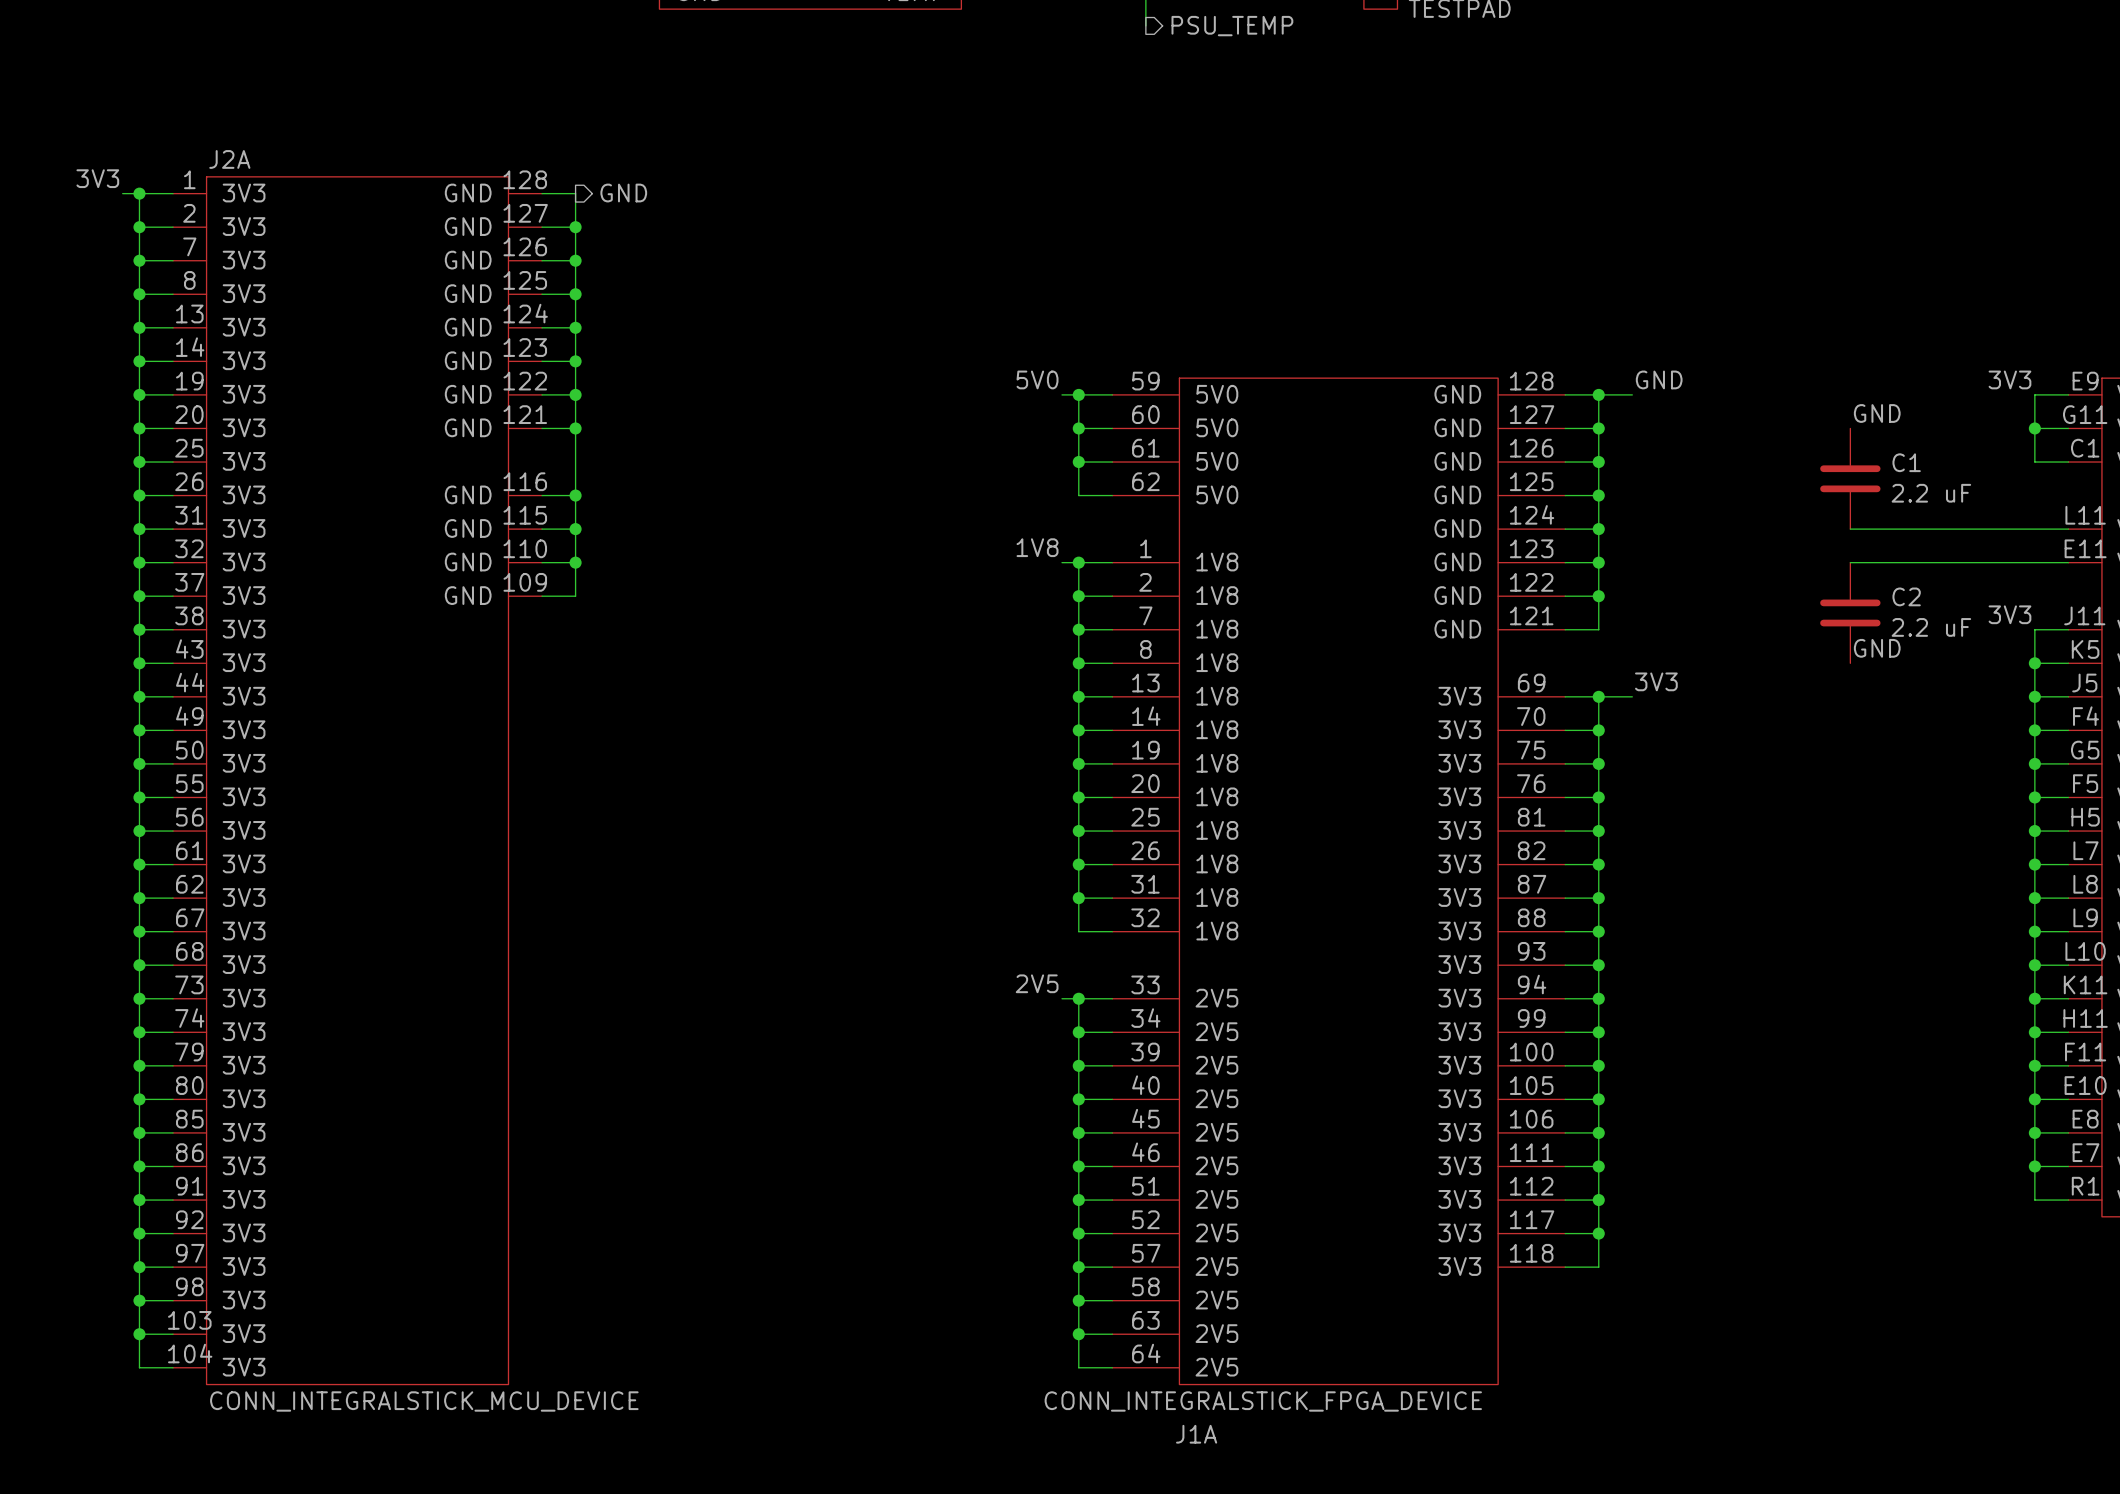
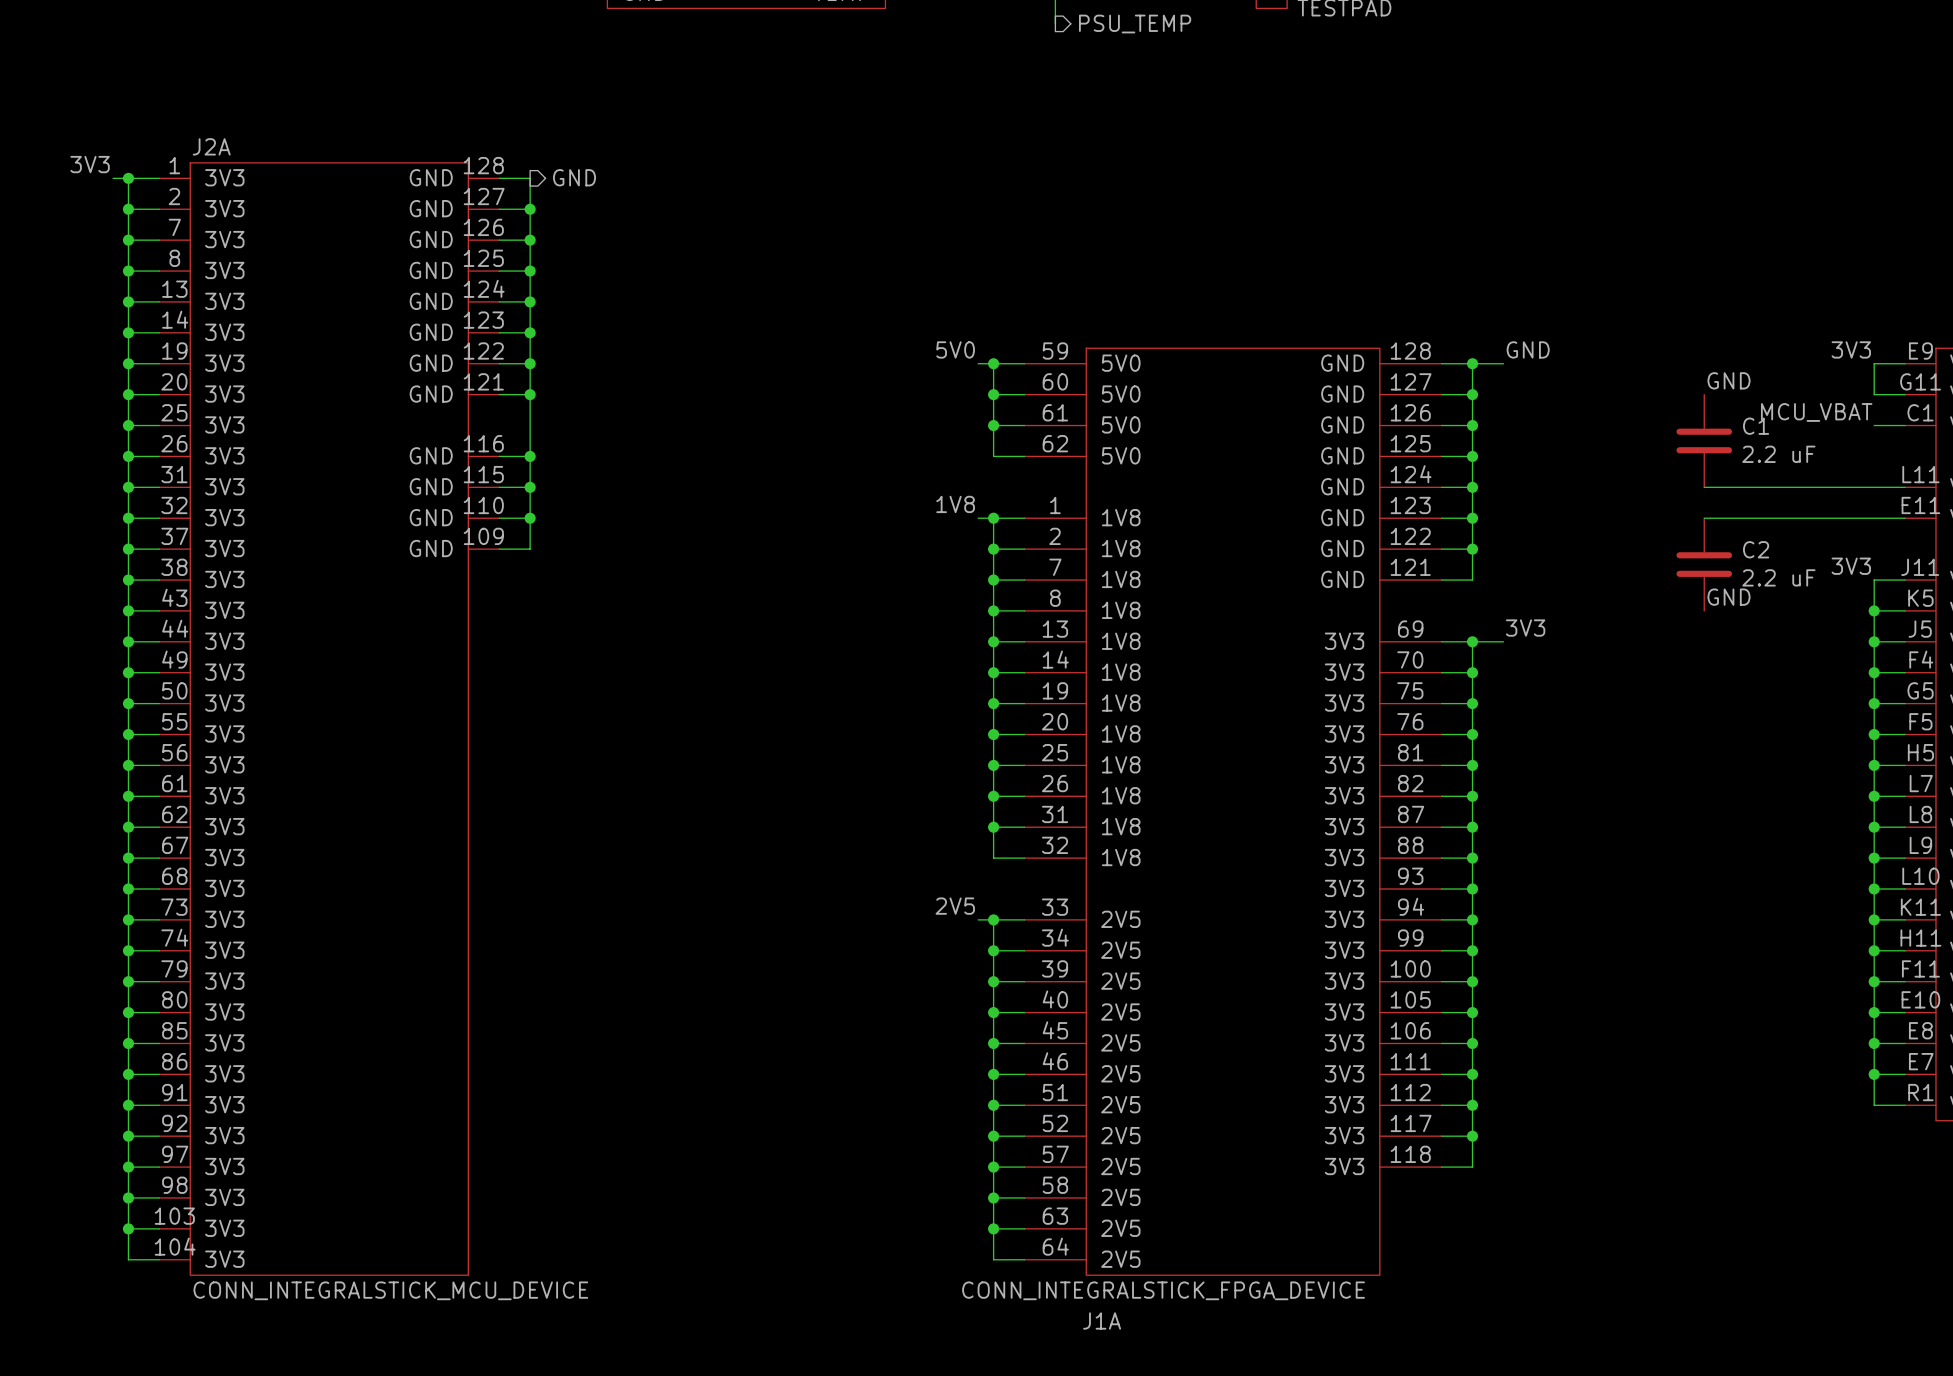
wire: (2034, 428) (2034, 462) -> none
junction: (2034, 428) -> none
label: none -> MCU_VBAT (1816, 412)

